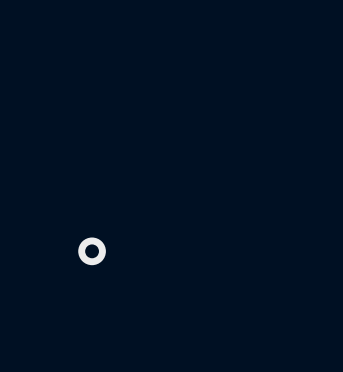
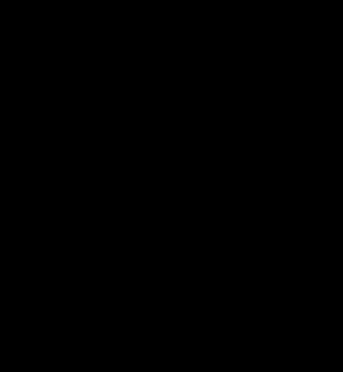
via: (92, 251) -> none

